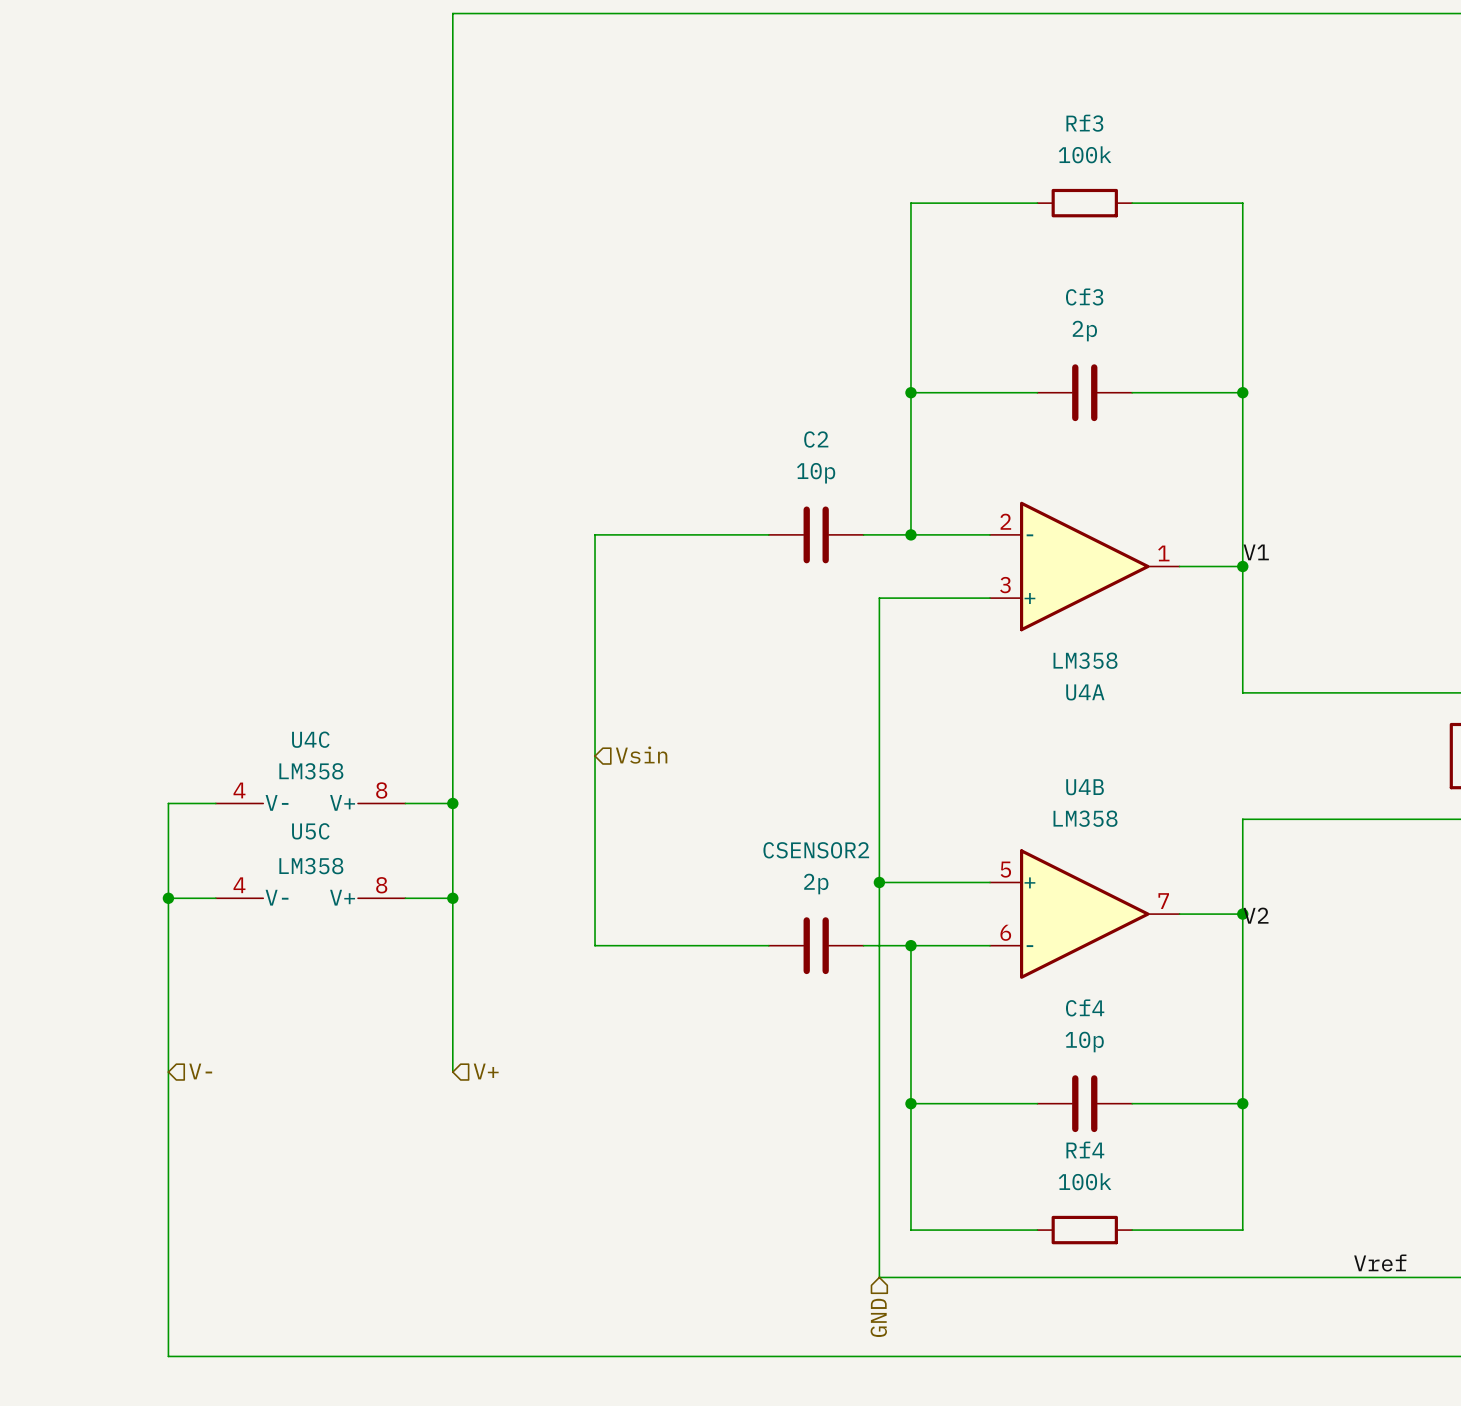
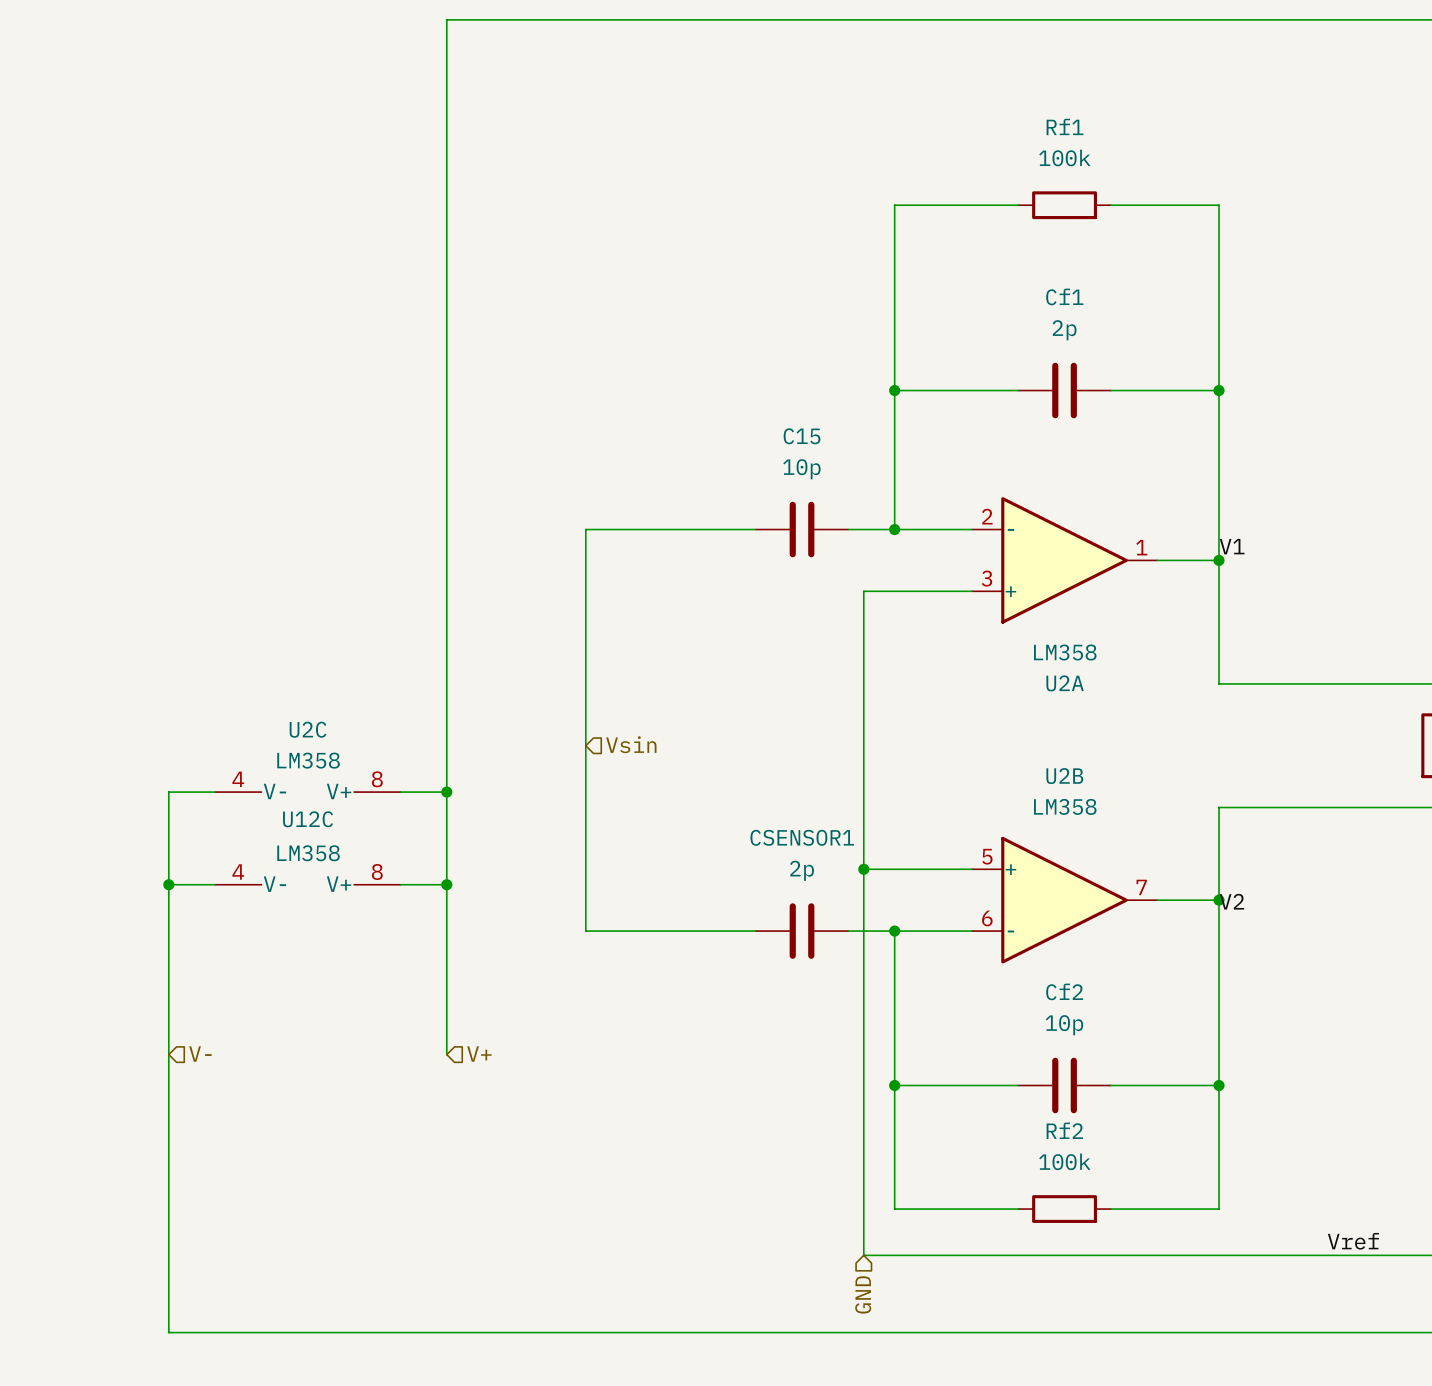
Rf3 name: Rf3 (1084, 123) -> Rf1 (1065, 126)
Cf3 name: Cf3 (1084, 296) -> Cf1 (1064, 296)
C2 name: C2 (816, 439) -> C15 (802, 436)
U4A name: U4A (1085, 692) -> U2A (1065, 683)
U4C name: U4C (310, 739) -> U2C (308, 729)
U4B name: U4B (1085, 787) -> U2B (1064, 776)
U5C name: U5C (310, 831) -> U12C (308, 819)
CSENSOR2 name: CSENSOR2 (816, 850) -> CSENSOR1 (802, 837)
Cf4 name: Cf4 (1085, 1007) -> Cf2 (1064, 991)
Rf4 name: Rf4 (1085, 1150) -> Rf2 (1064, 1130)

